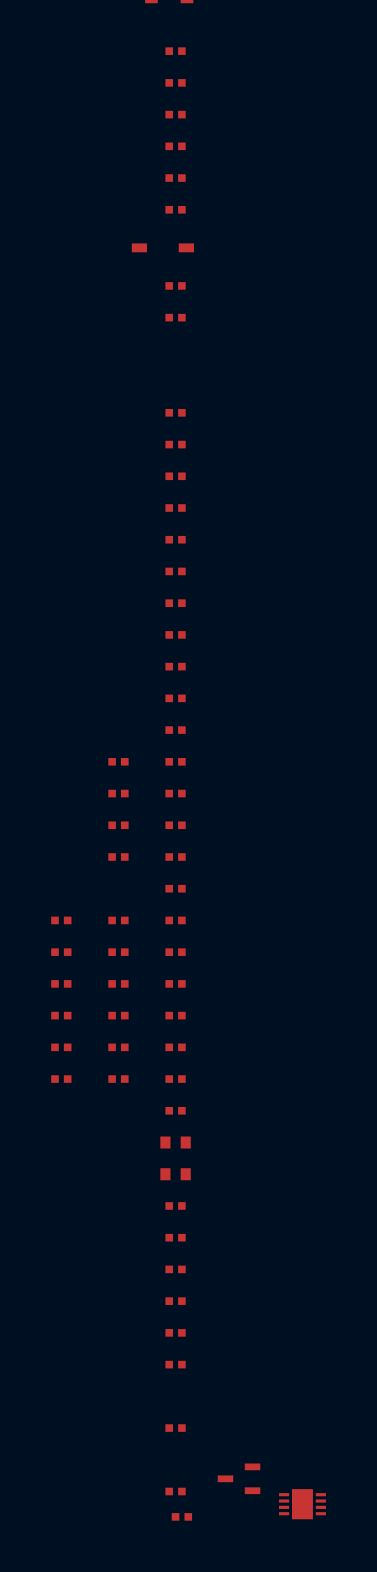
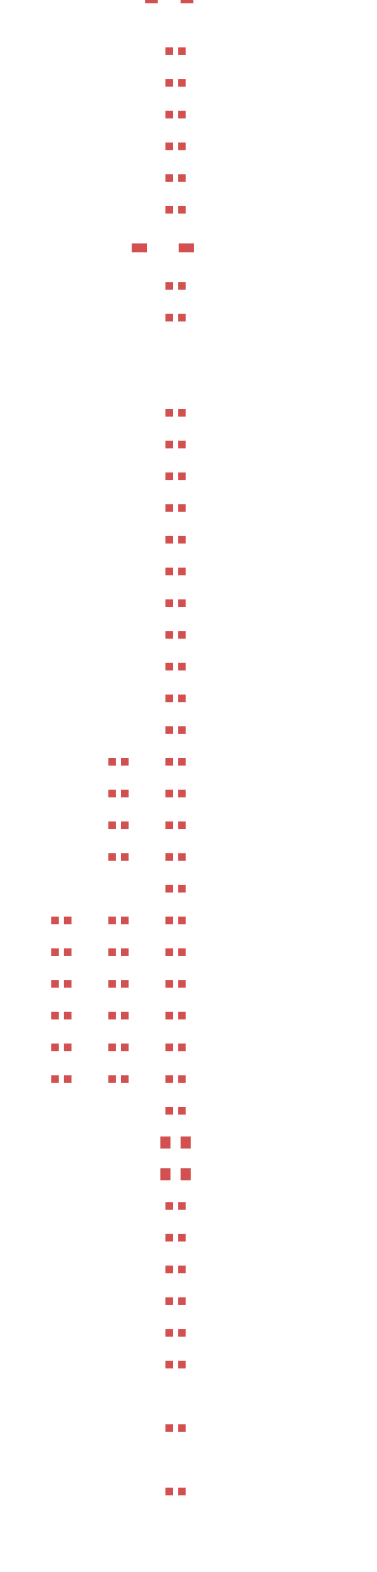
part: (239, 1478) -> none
part: (302, 1504) -> none
part: (181, 1516) -> none

